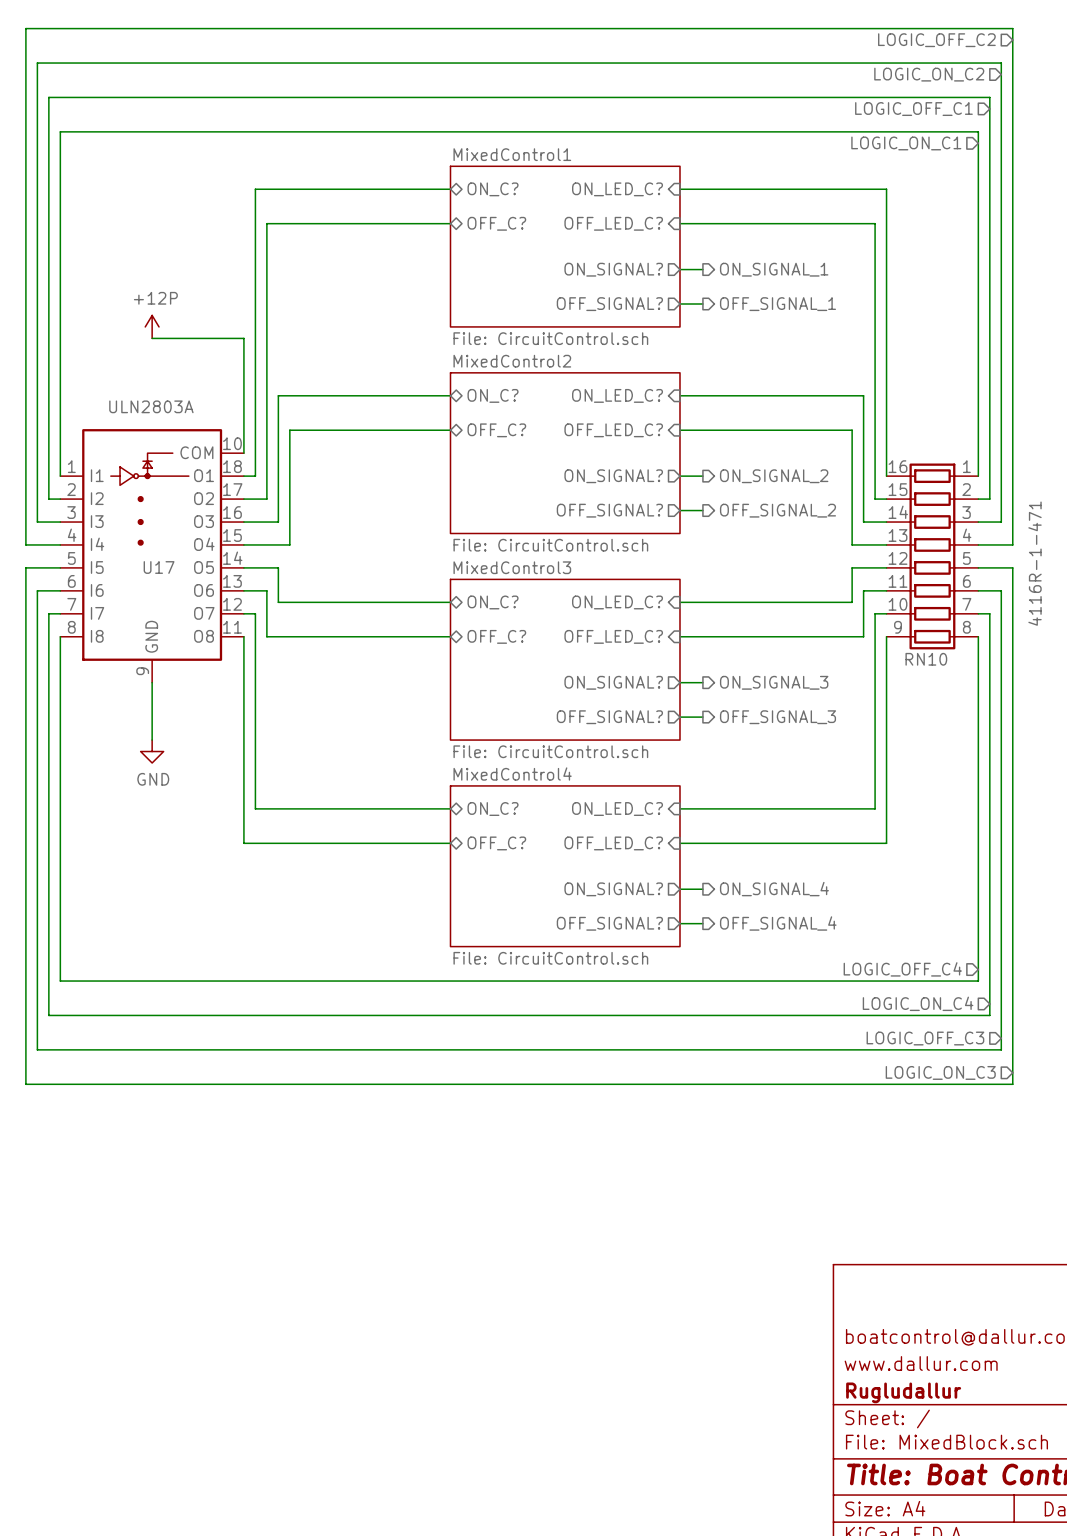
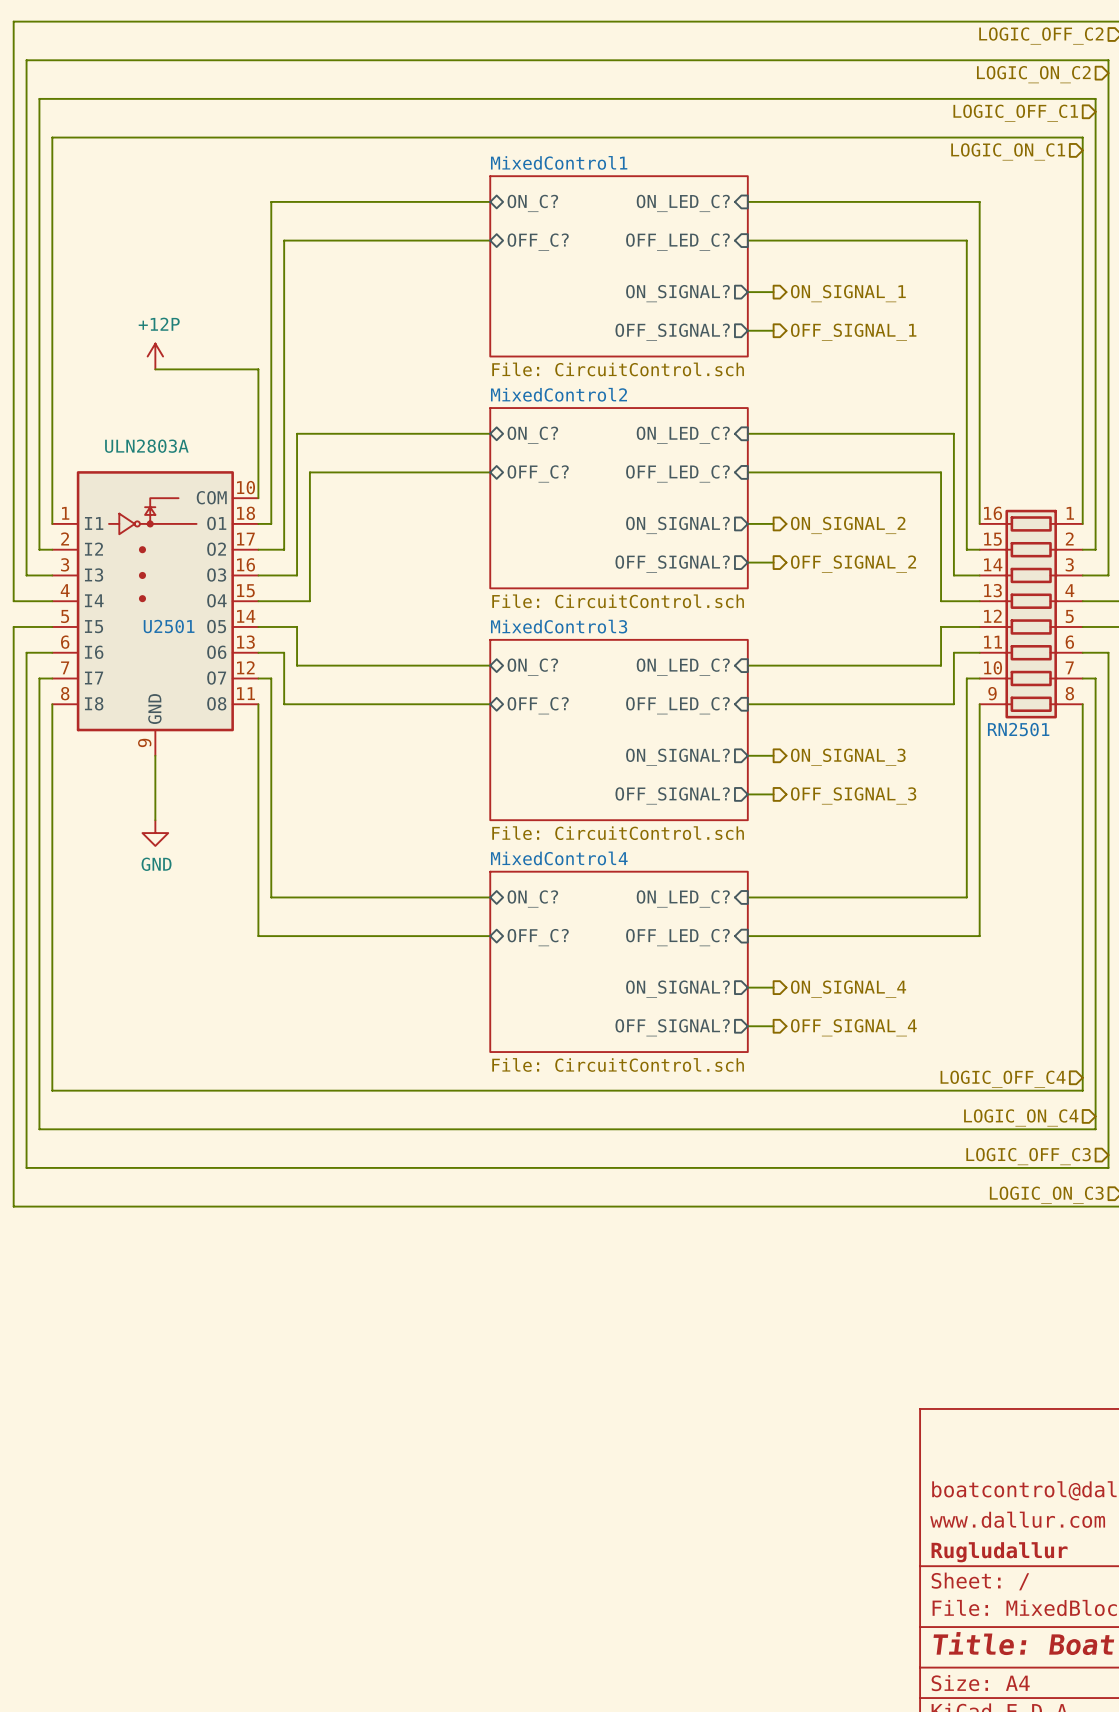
U17 name: U17 (159, 567) -> U2501 (169, 626)
RN10 name: RN10 (926, 659) -> RN2501 (1018, 729)

